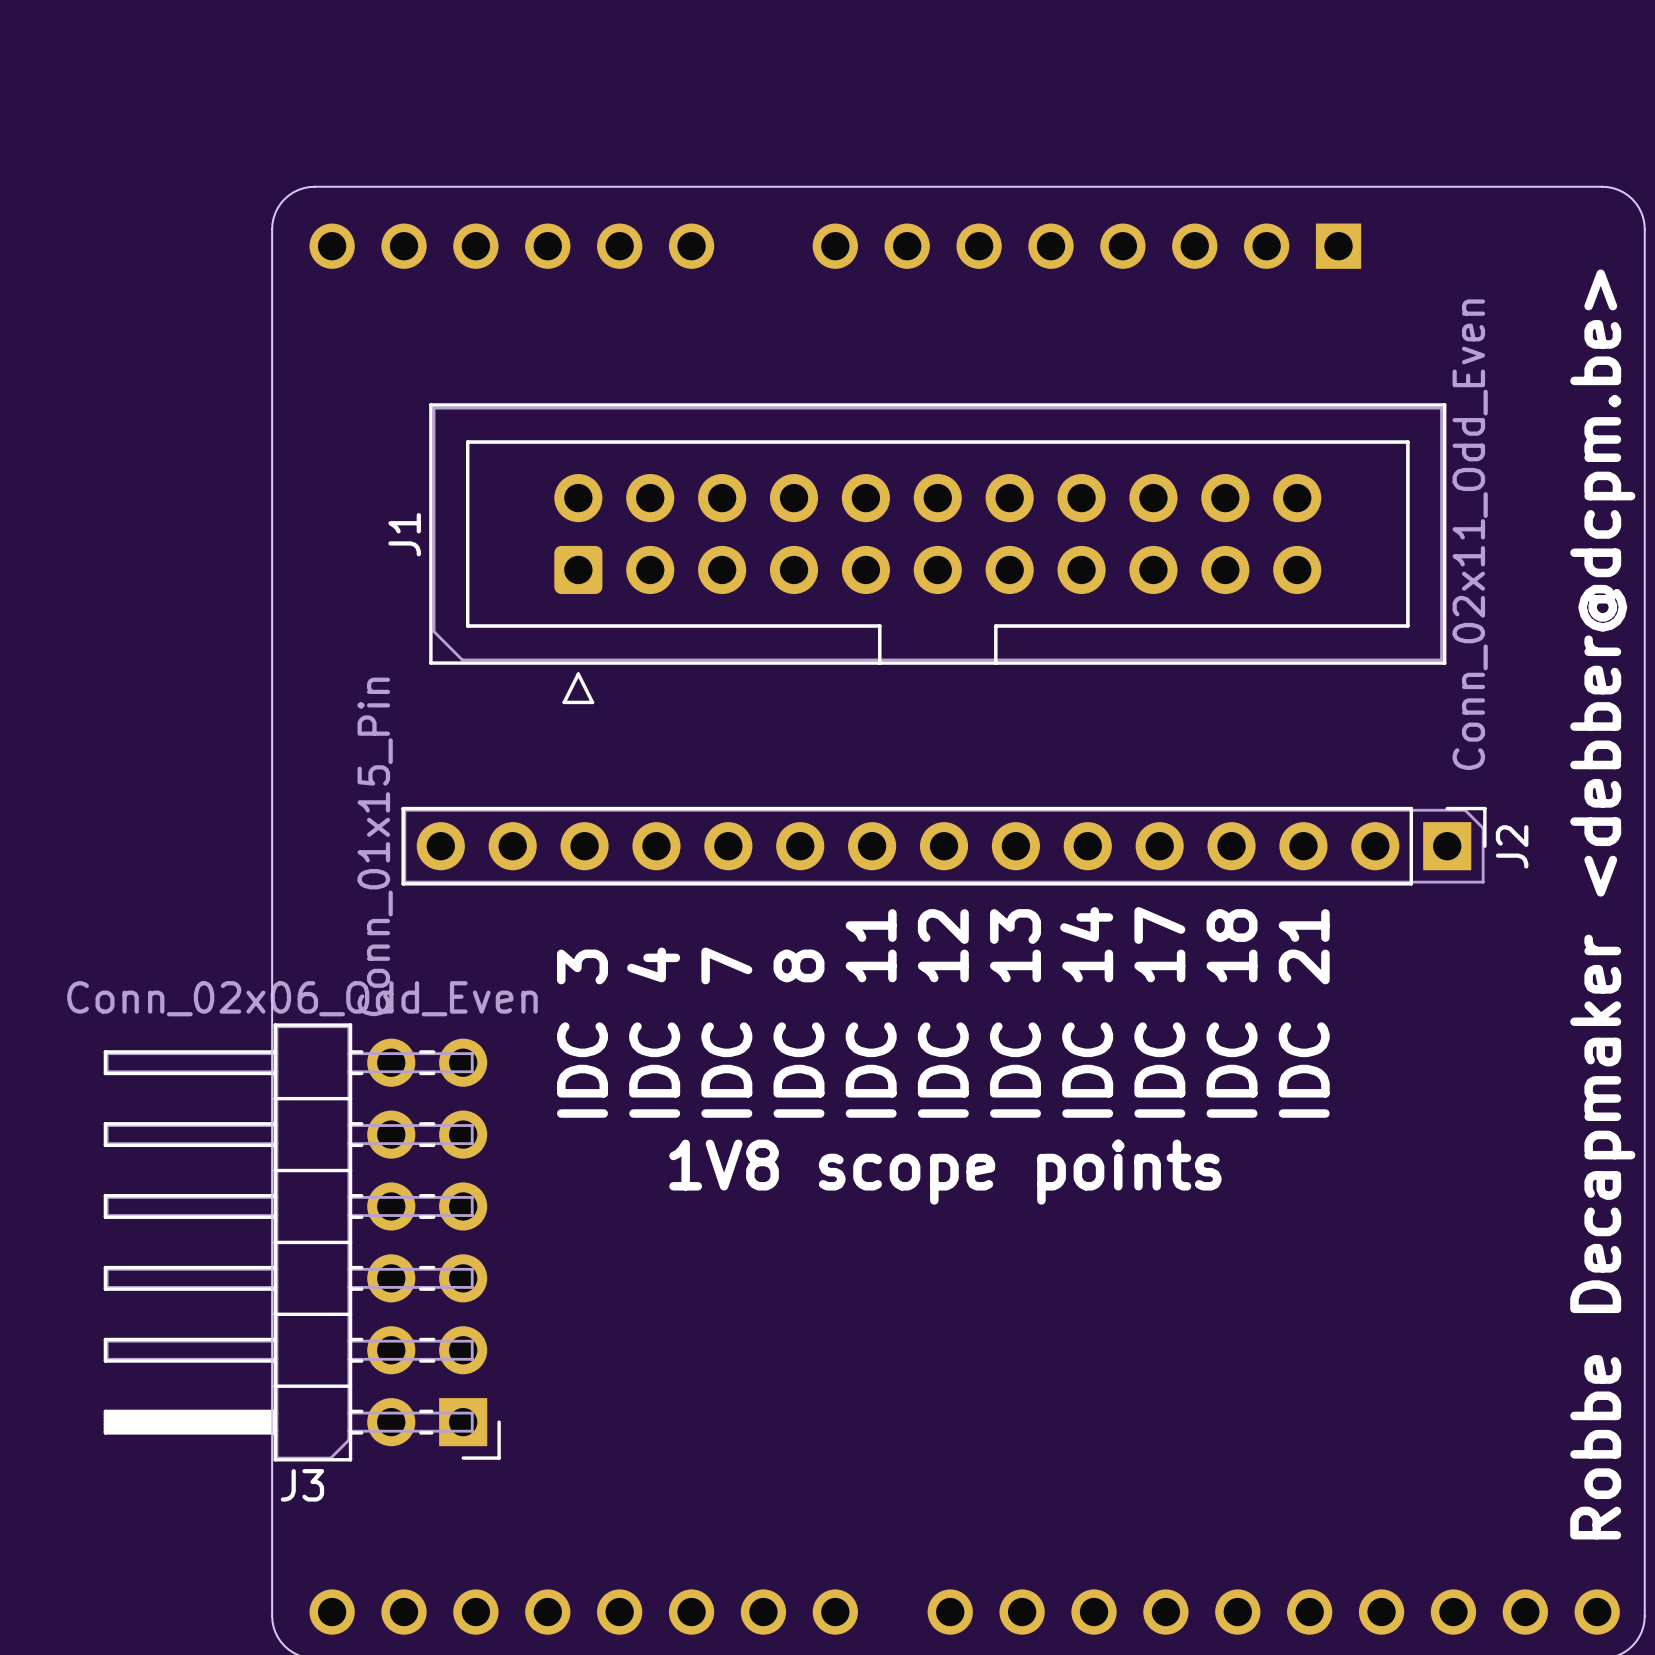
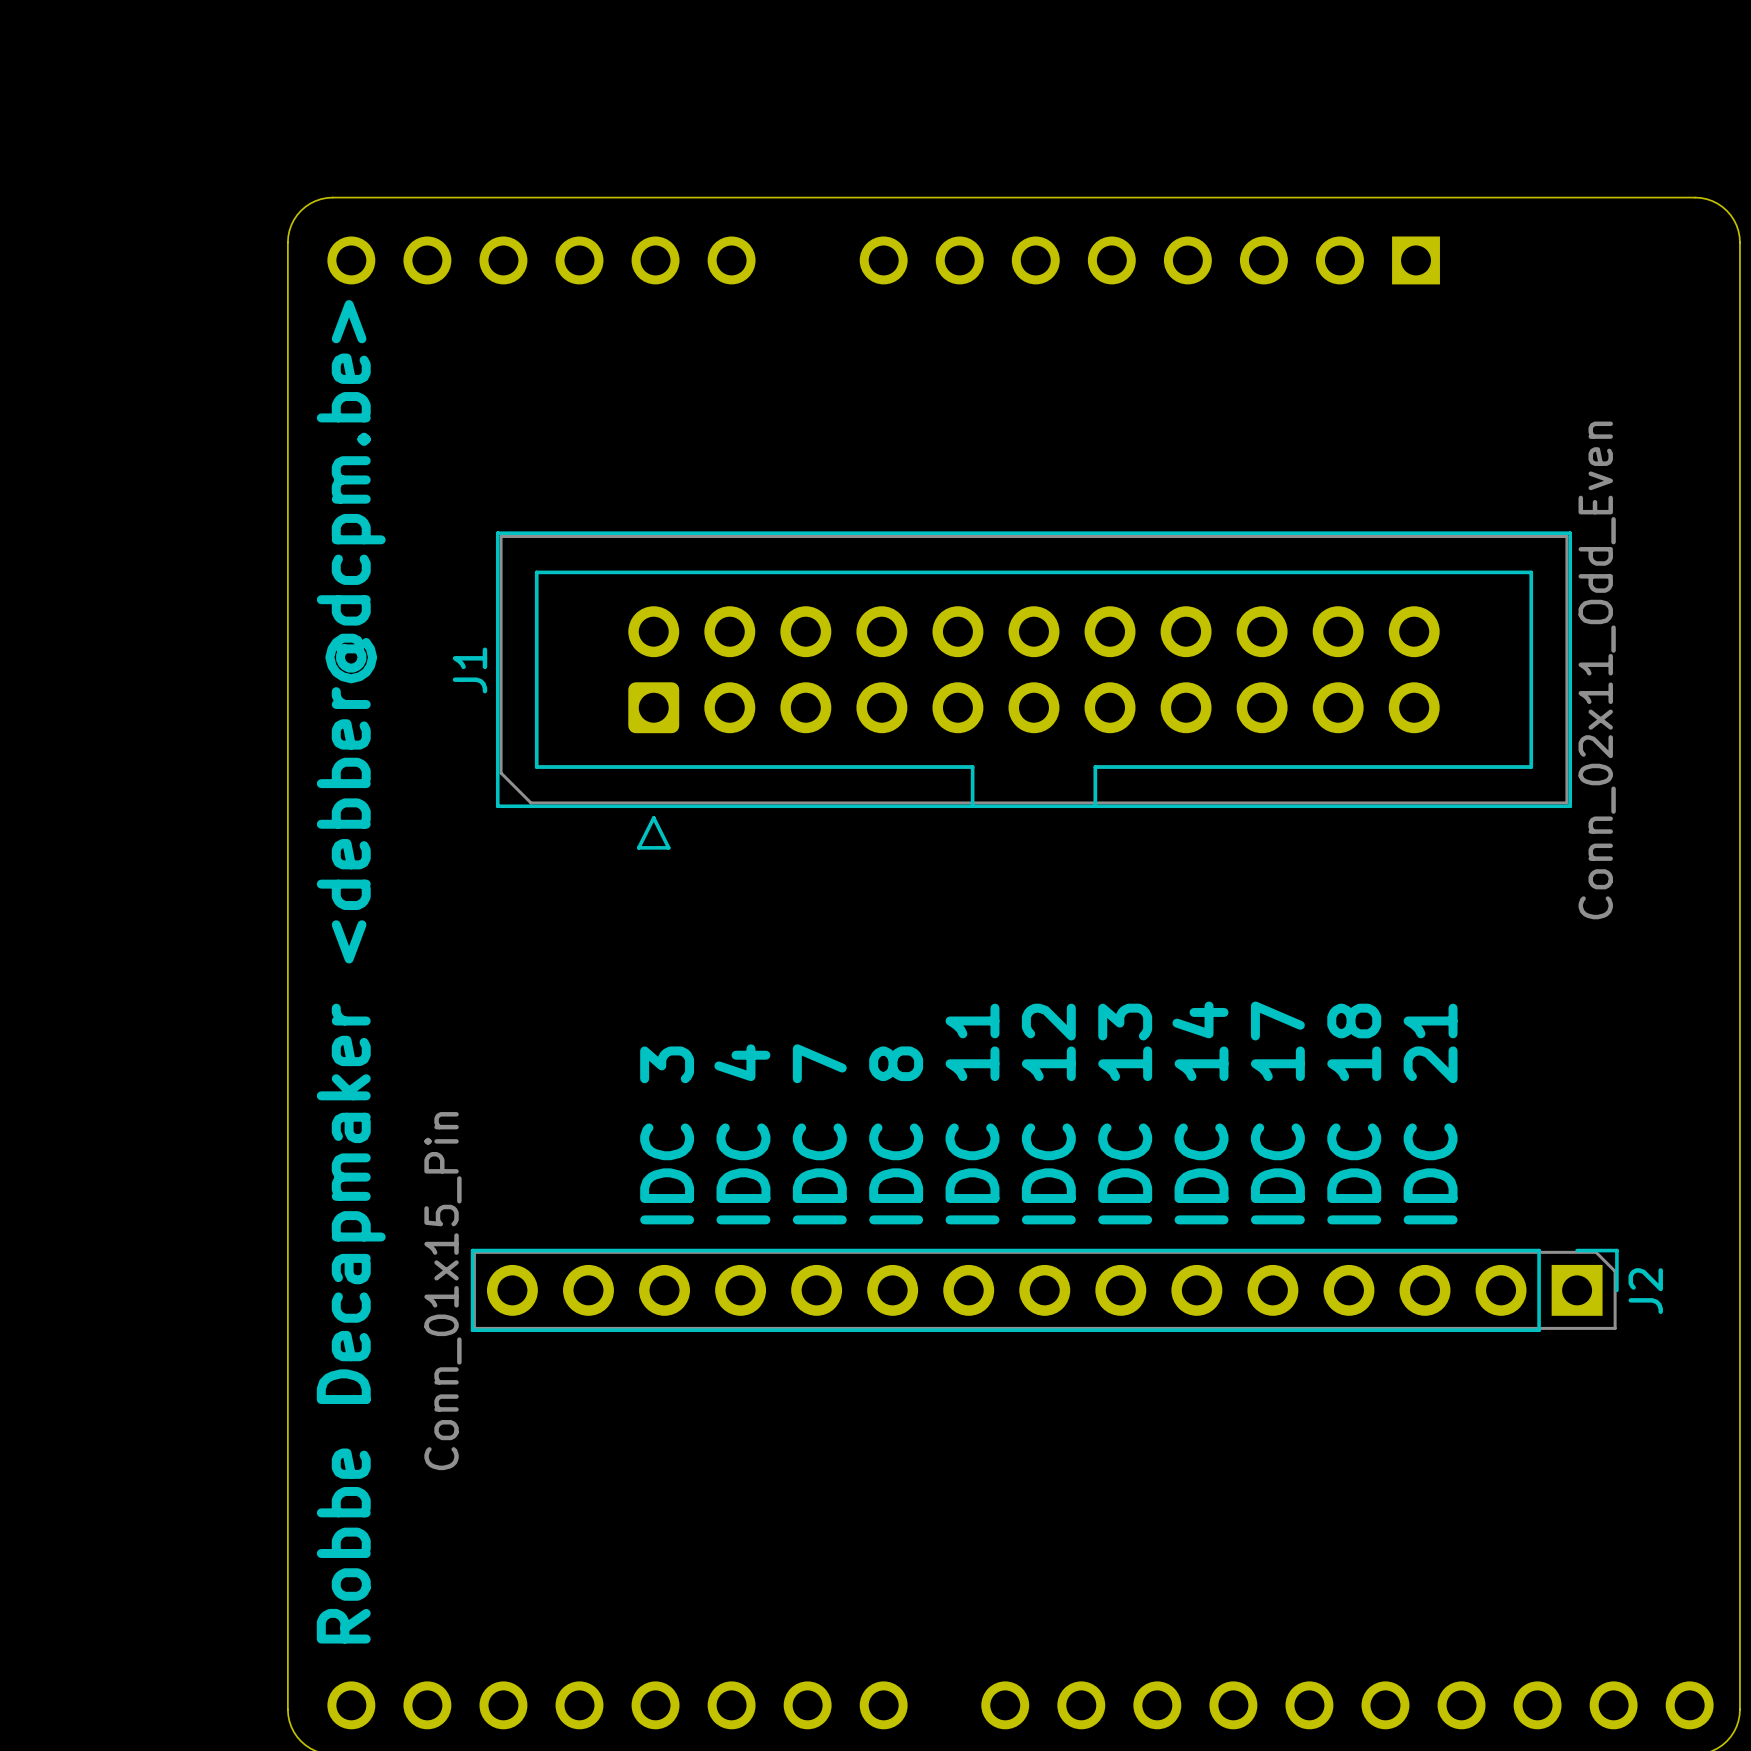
J1 position: (937, 553) -> (1033, 690)
J2 position: (944, 846) -> (1044, 1290)
text: Robbe Decapmaker <debber@dcpm.be> (1602, 904) -> none
text: none -> Robbe Decapmaker <debber@dcpm.be> (351, 971)
text position: IDC 14 (1086, 1012) -> IDC 14 (1200, 1112)
text position: IDC 17 (1159, 1012) -> IDC 17 (1277, 1112)
text position: IDC 11 (871, 1013) -> IDC 11 (972, 1114)
text position: IDC 12 (943, 1013) -> IDC 12 (1048, 1114)
text position: IDC 13 (1015, 1013) -> IDC 13 (1125, 1114)
text position: IDC 18 (1232, 1013) -> IDC 18 (1354, 1114)
text position: IDC 21 (1304, 1013) -> IDC 21 (1430, 1114)
text position: IDC 4 (653, 1032) -> IDC 4 (742, 1134)
text position: IDC 7 (726, 1032) -> IDC 7 (819, 1134)
text position: IDC 3 (582, 1033) -> IDC 3 (667, 1135)
text position: IDC 8 (799, 1033) -> IDC 8 (896, 1135)
text: 1V8 scope points (945, 1172) -> none
J3: Conn_02x06_Odd_Even (302, 1242) -> none

